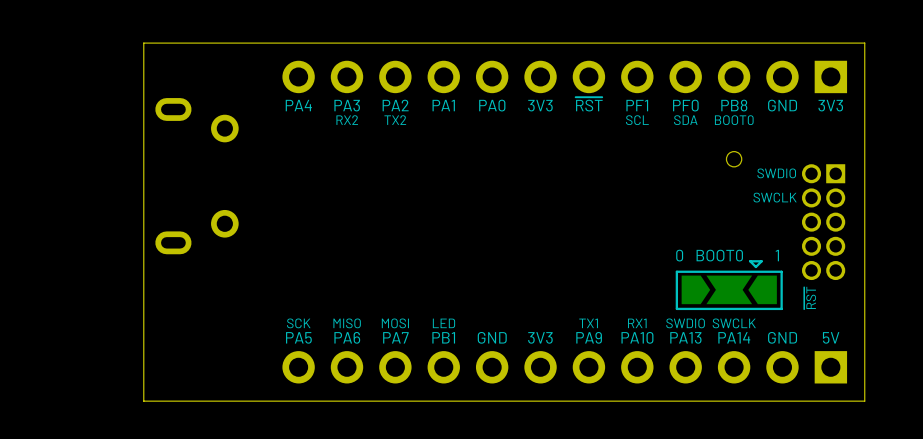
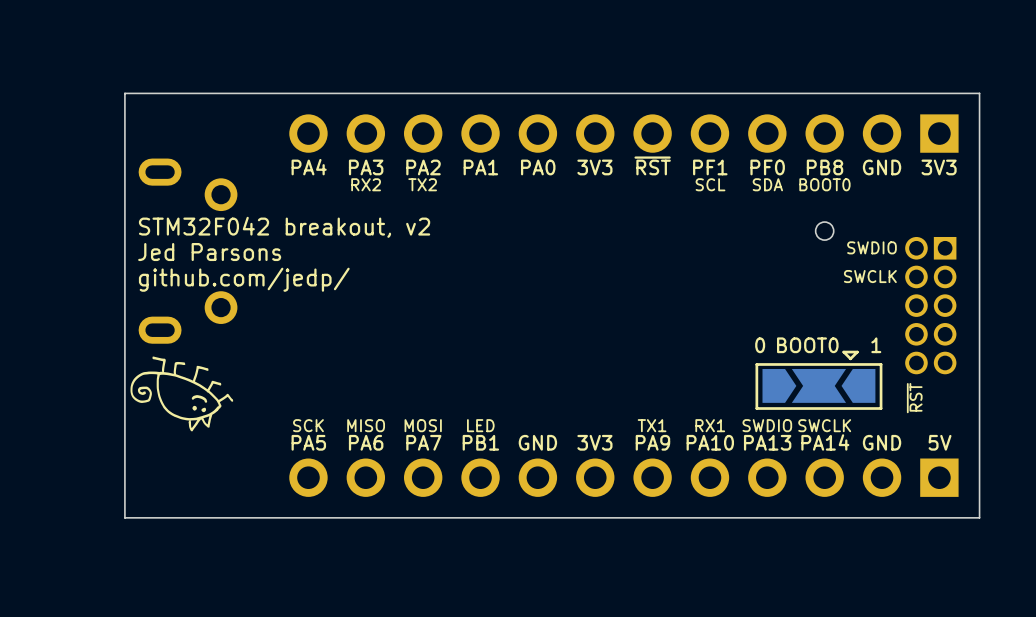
text: none -> STM32F042 breakout, v2 (284, 227)
text: none -> Jed Parsons (209, 252)
text: none -> github.com/jedp/ (244, 279)
drawing: none -> [130, 356, 234, 432]

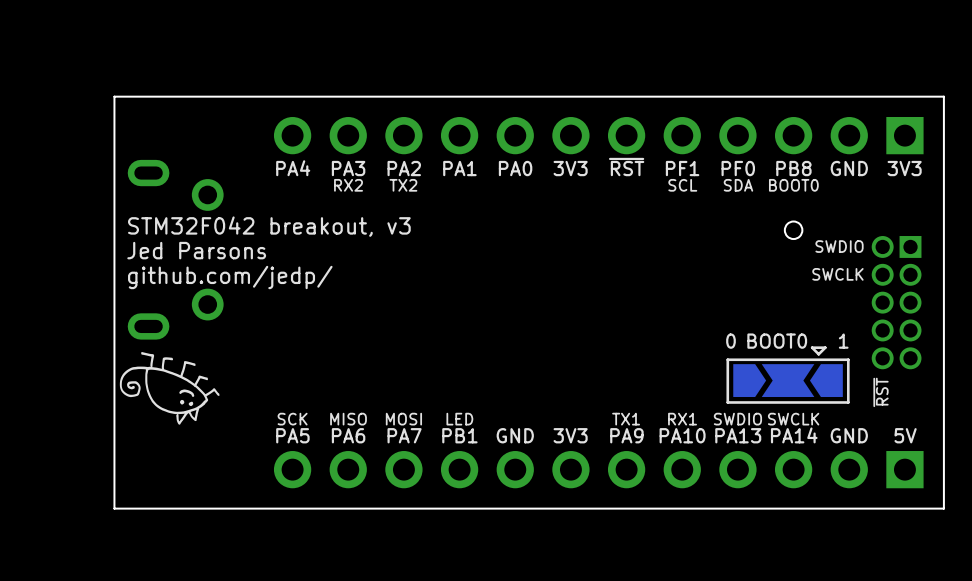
text: STM32F042 breakout, v2 (284, 227) -> STM32F042 breakout, v3 (269, 226)

